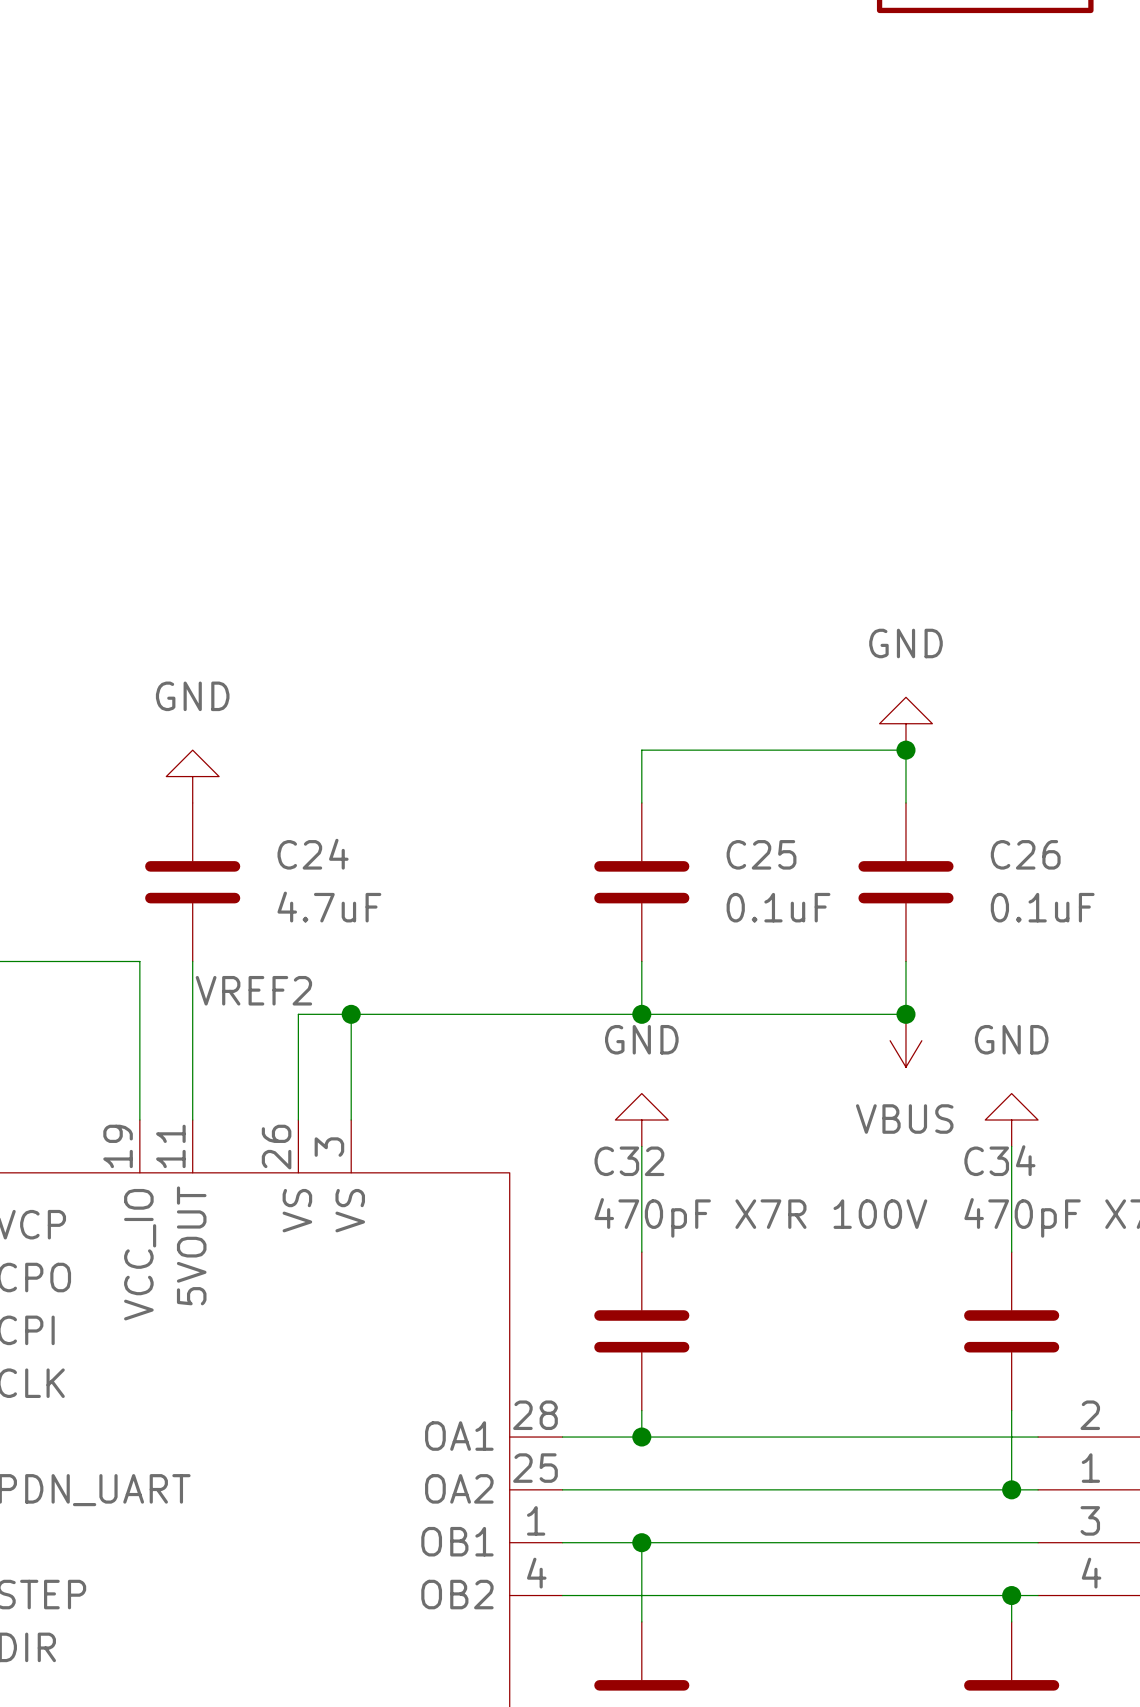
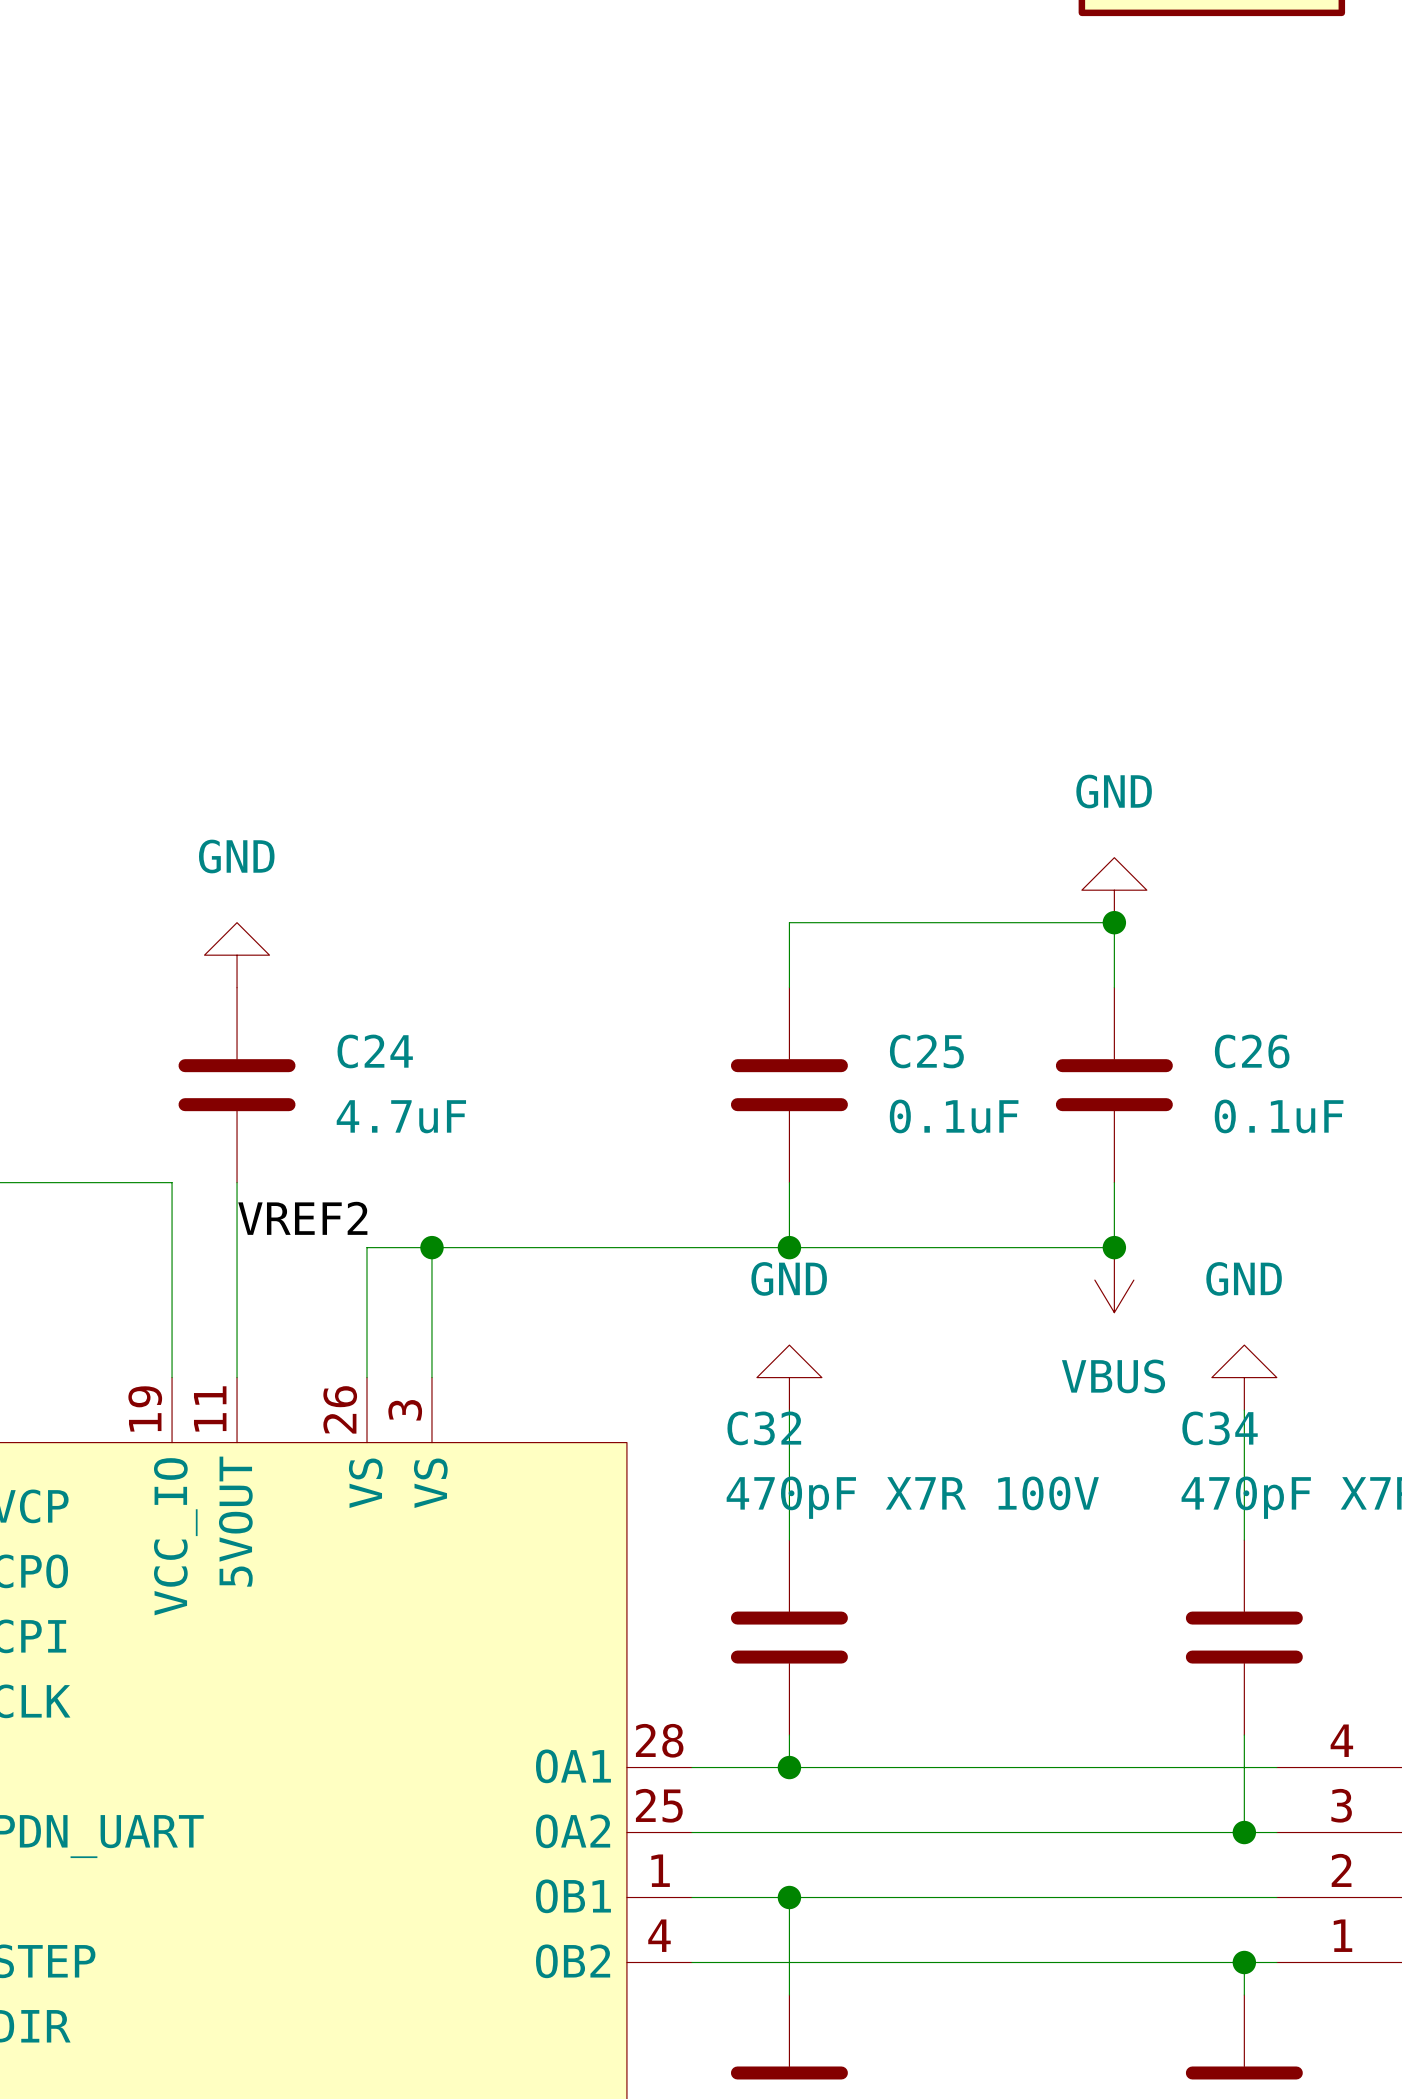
part pin number: 2 (1090, 1415) -> 4 (1341, 1740)
part pin number: 1 (1090, 1468) -> 3 (1341, 1805)
part pin number: 3 (1090, 1520) -> 2 (1341, 1870)
part pin number: 4 (1091, 1573) -> 1 (1342, 1935)

